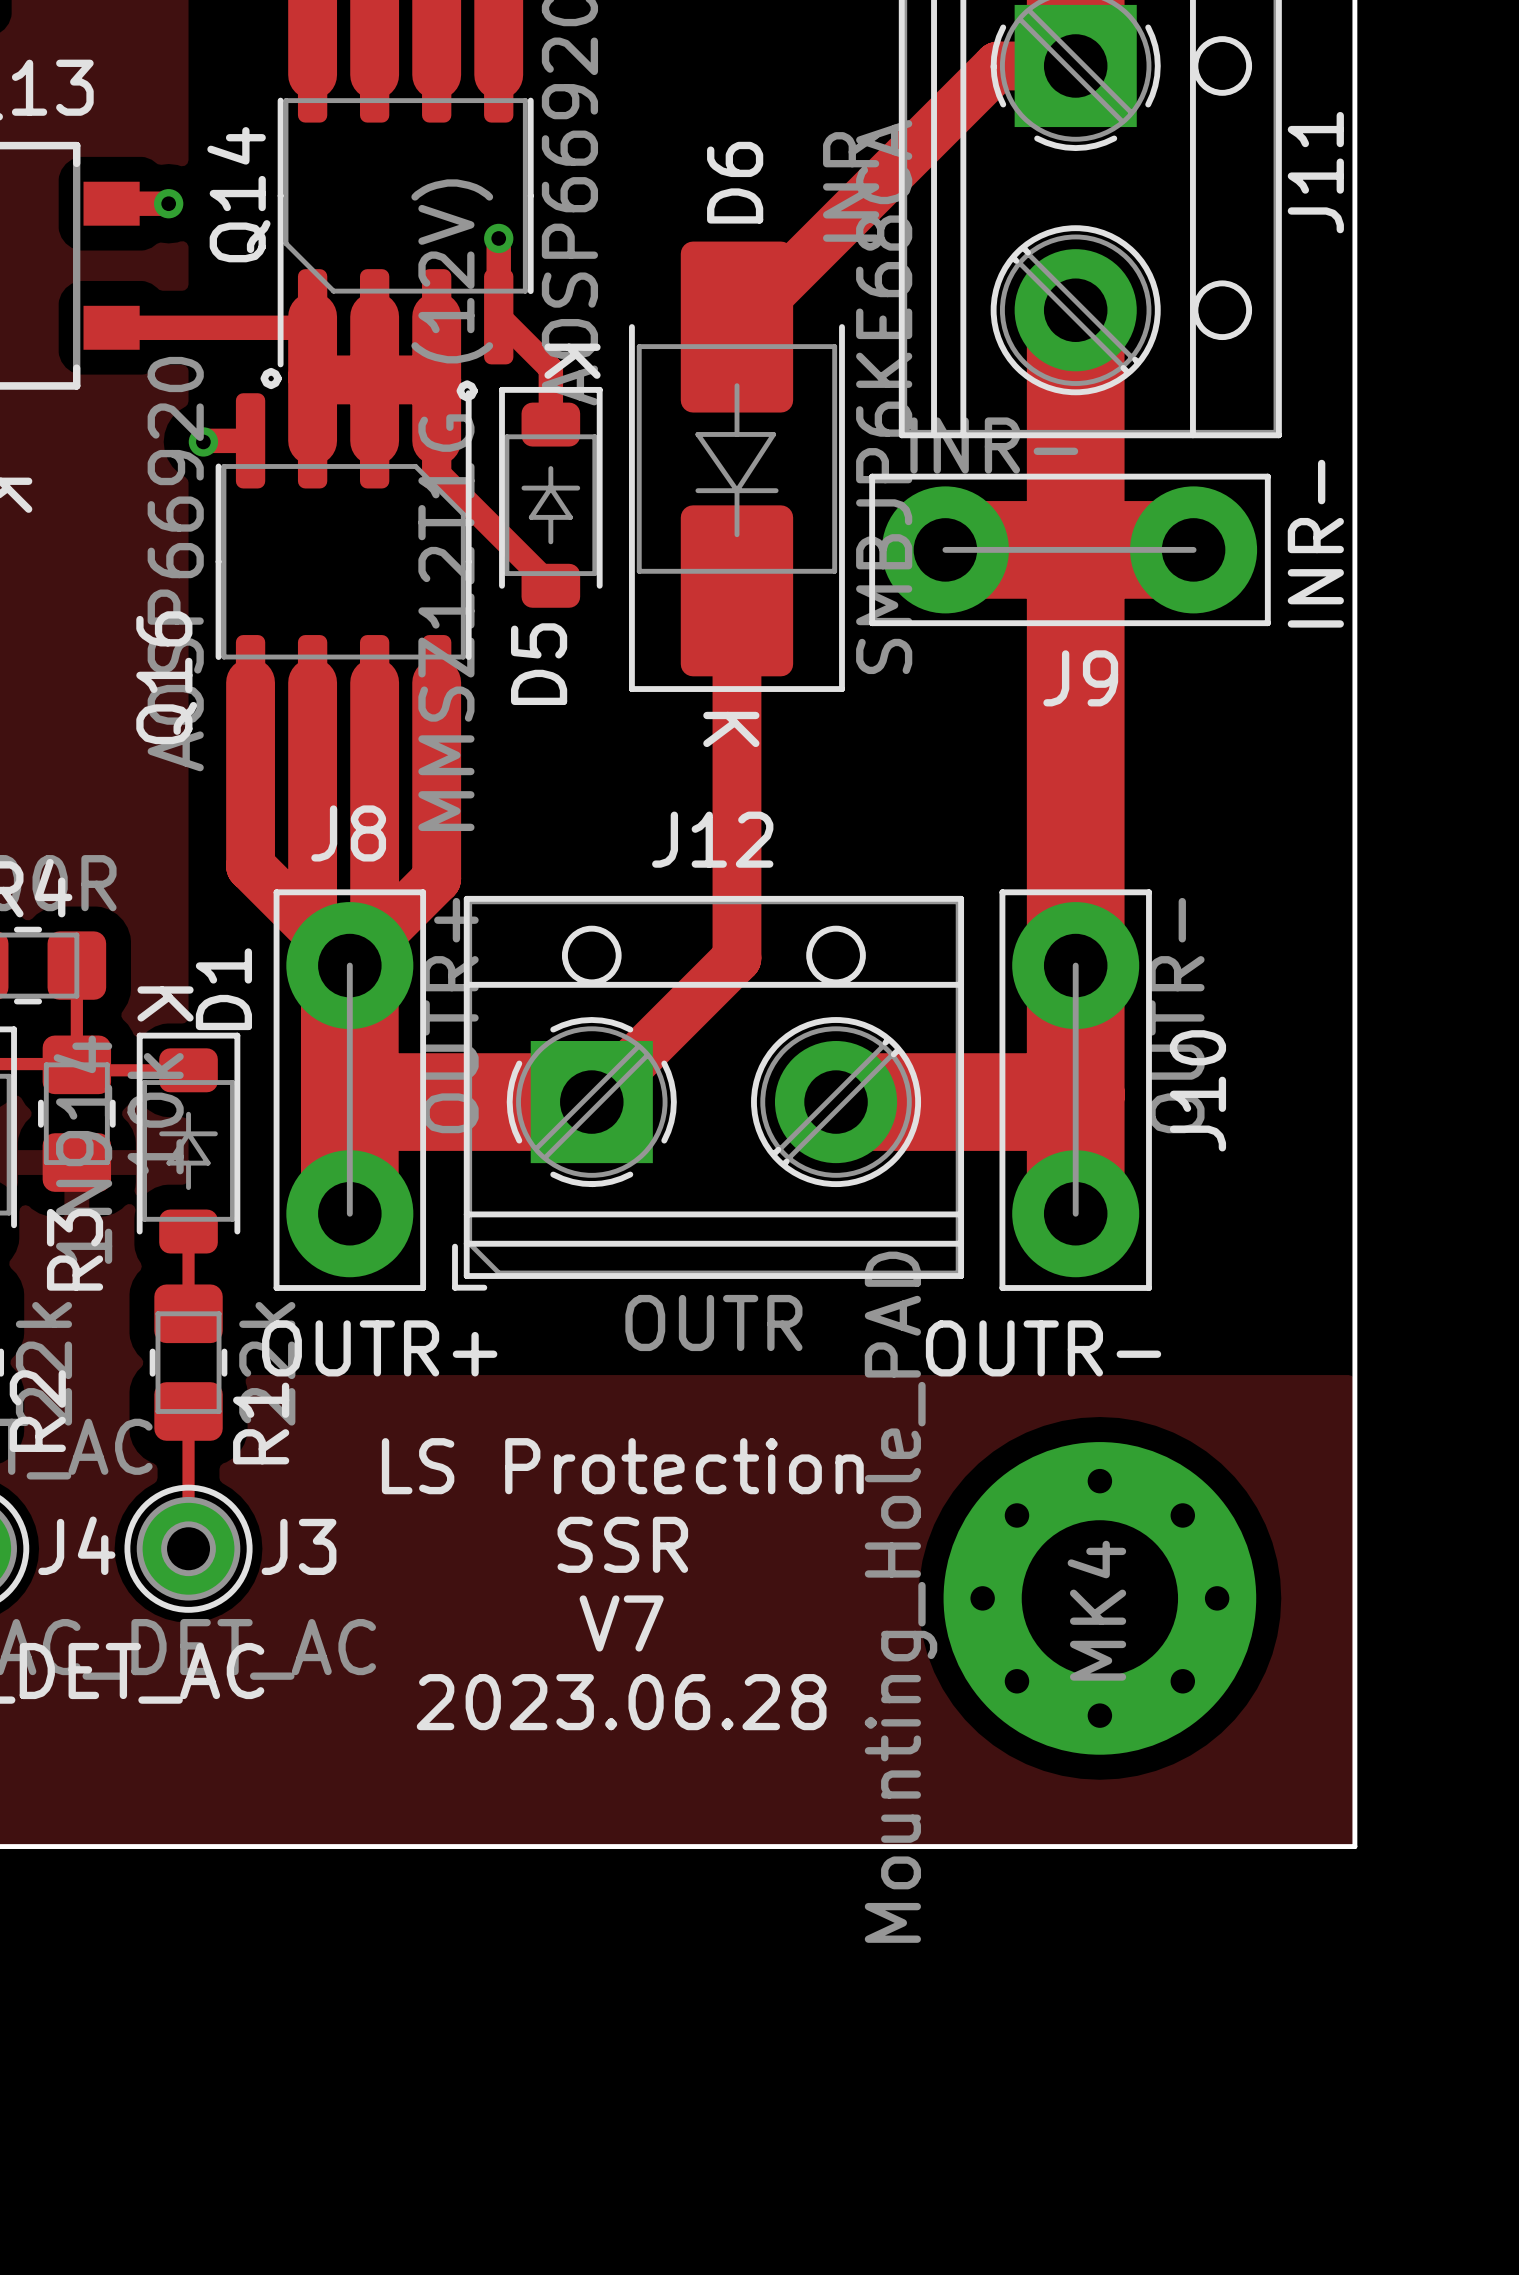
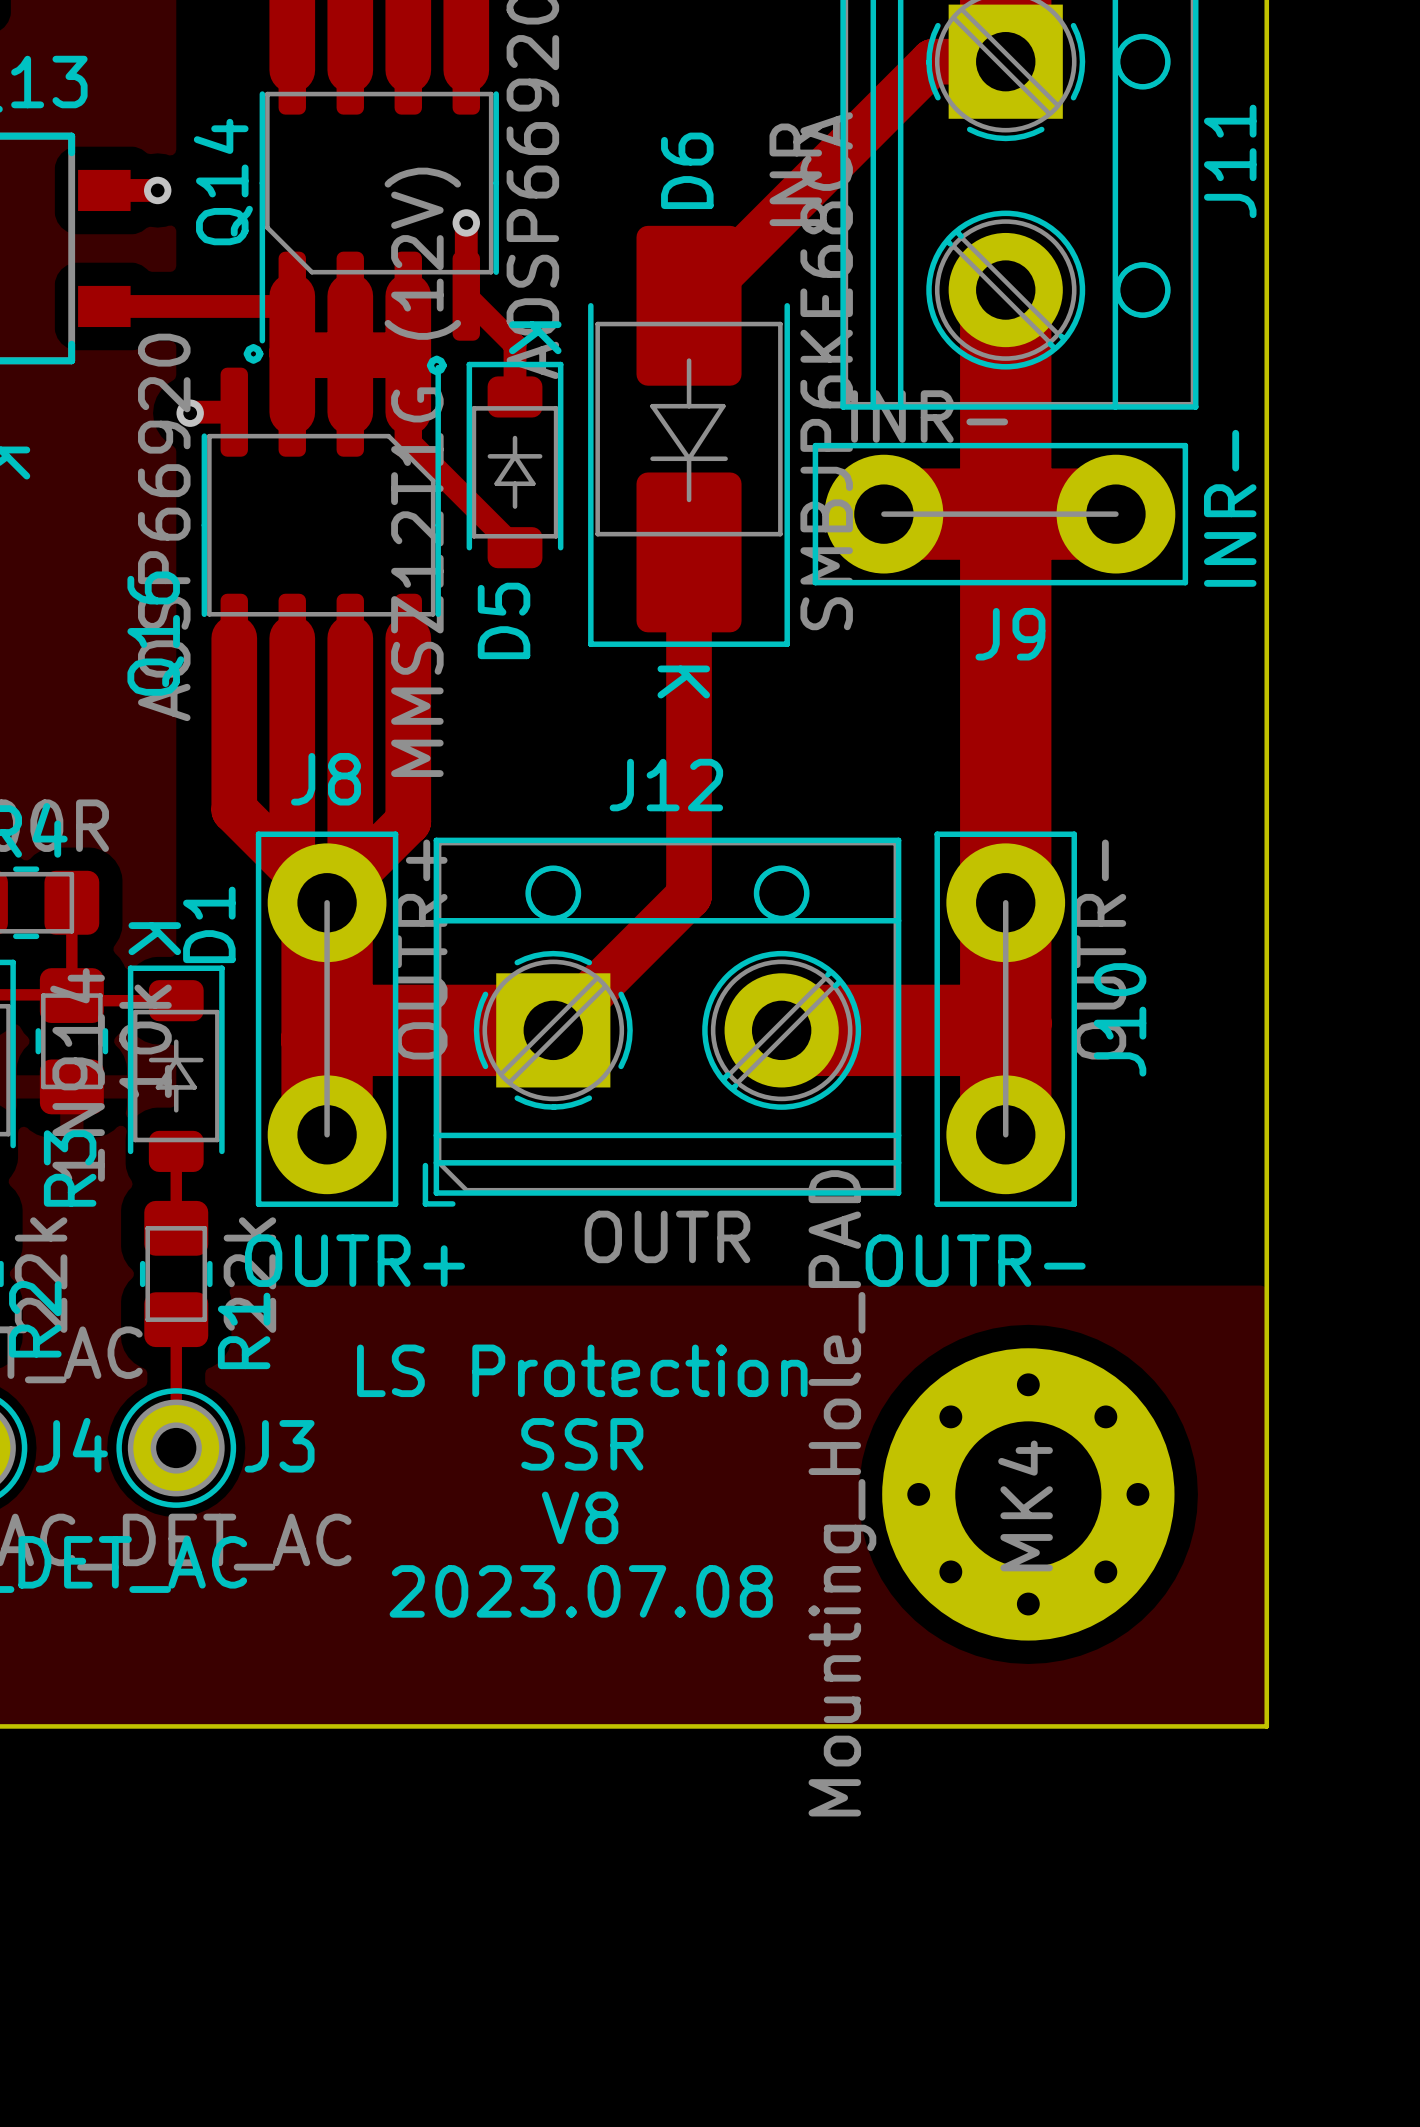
text: V7 (621, 1623) -> V8 (580, 1517)
text: 2023.06.28 (621, 1702) -> 2023.07.08 (581, 1591)

